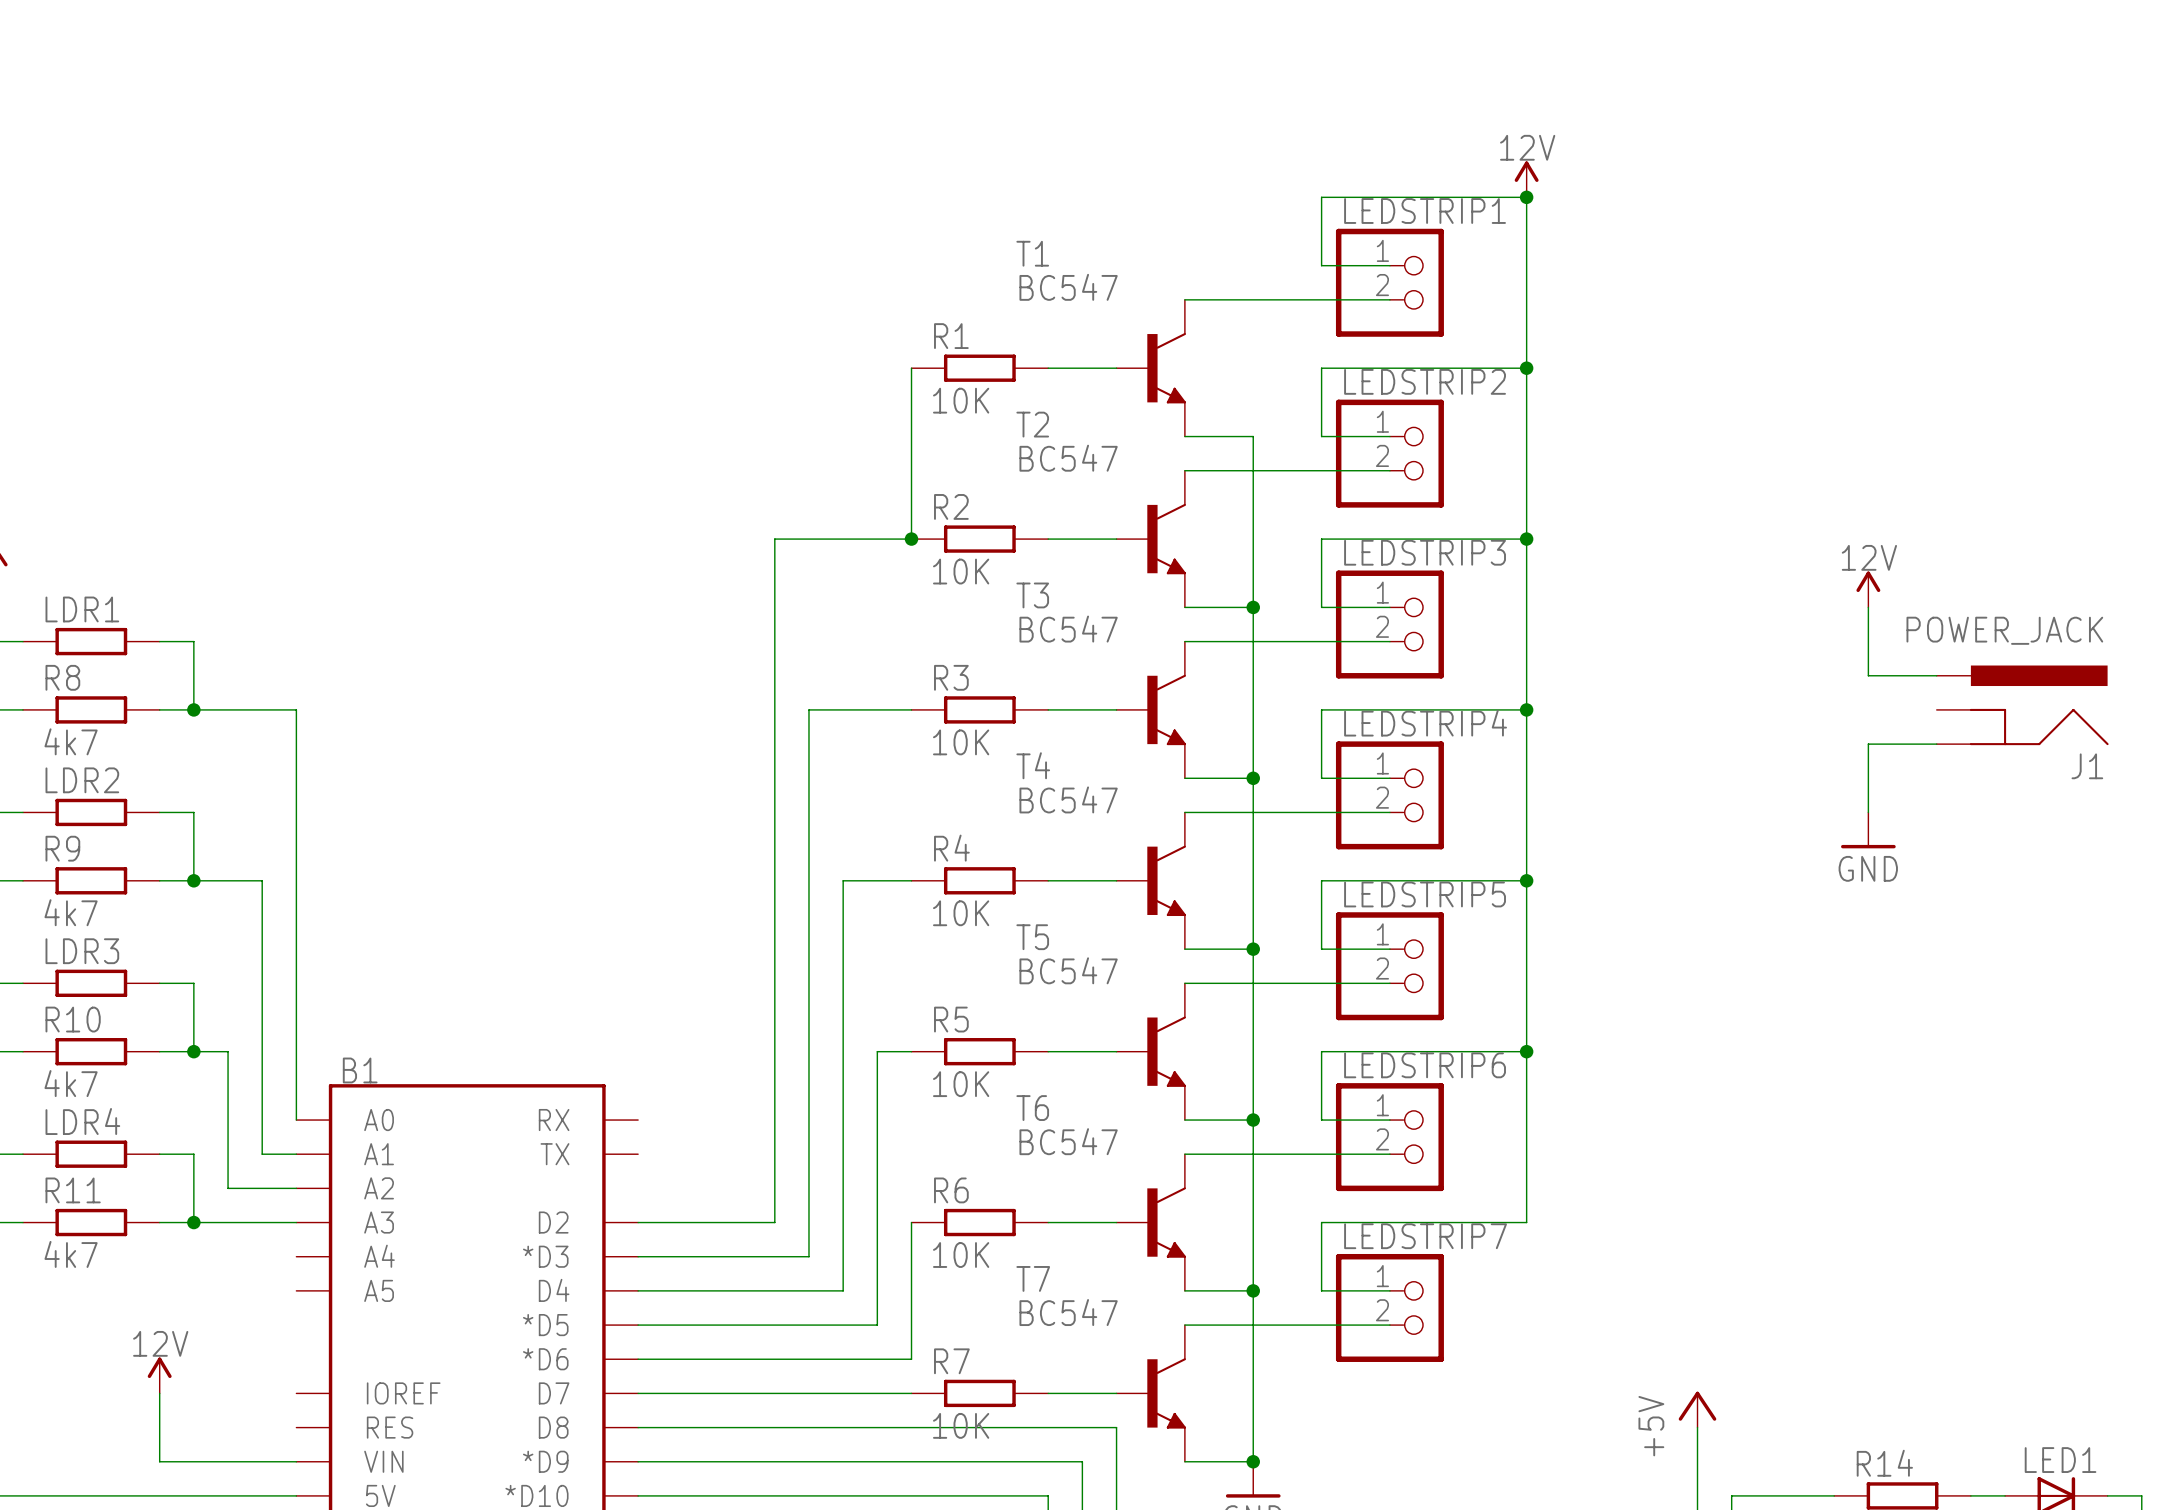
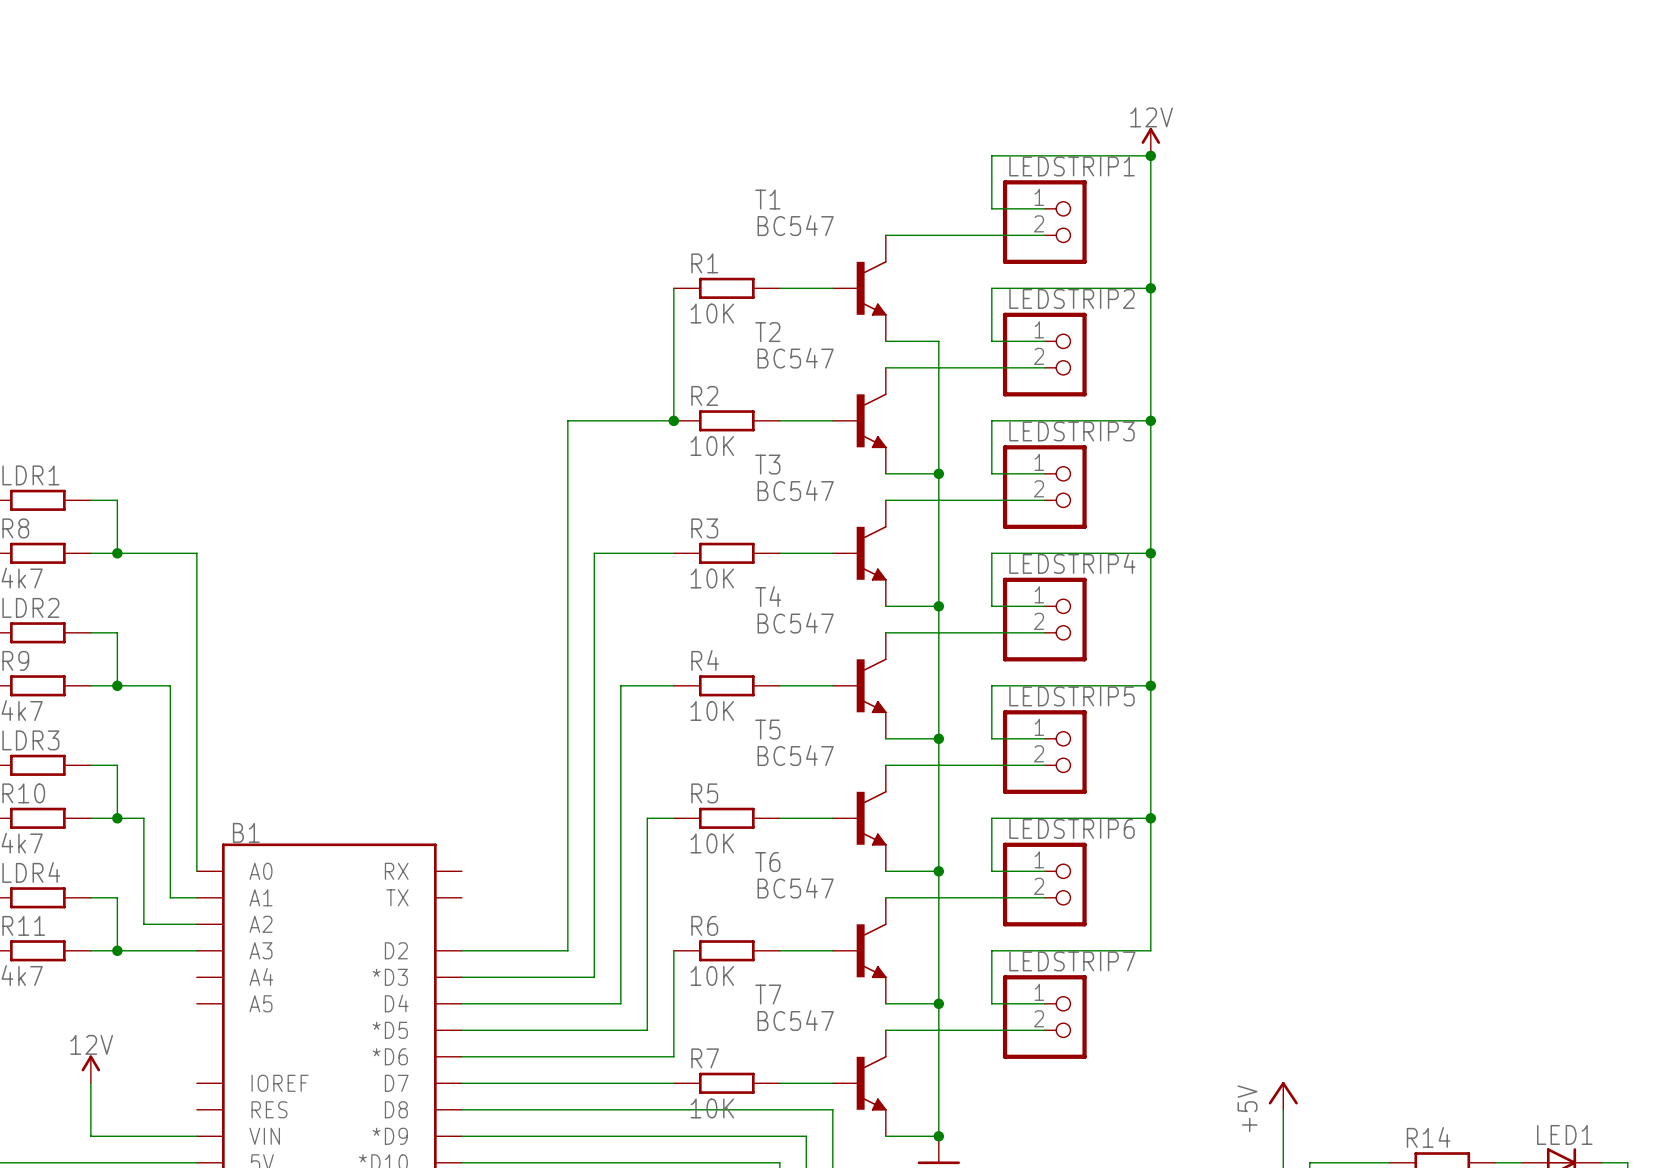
power symbol: 12V (1868, 589) -> none
wire: (1868, 607) (1868, 675) (1936, 675) -> none
J1: POWER_JACK (2022, 705) -> none
wire: (1936, 744) (1868, 744) (1868, 812) -> none
power symbol: GND (1868, 830) -> none

